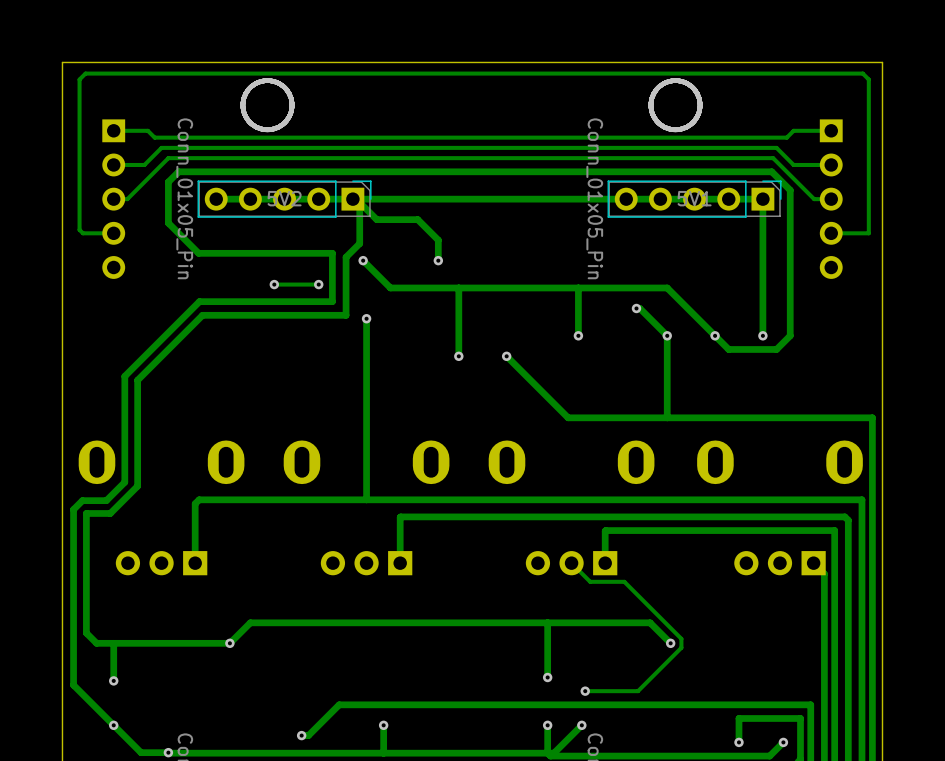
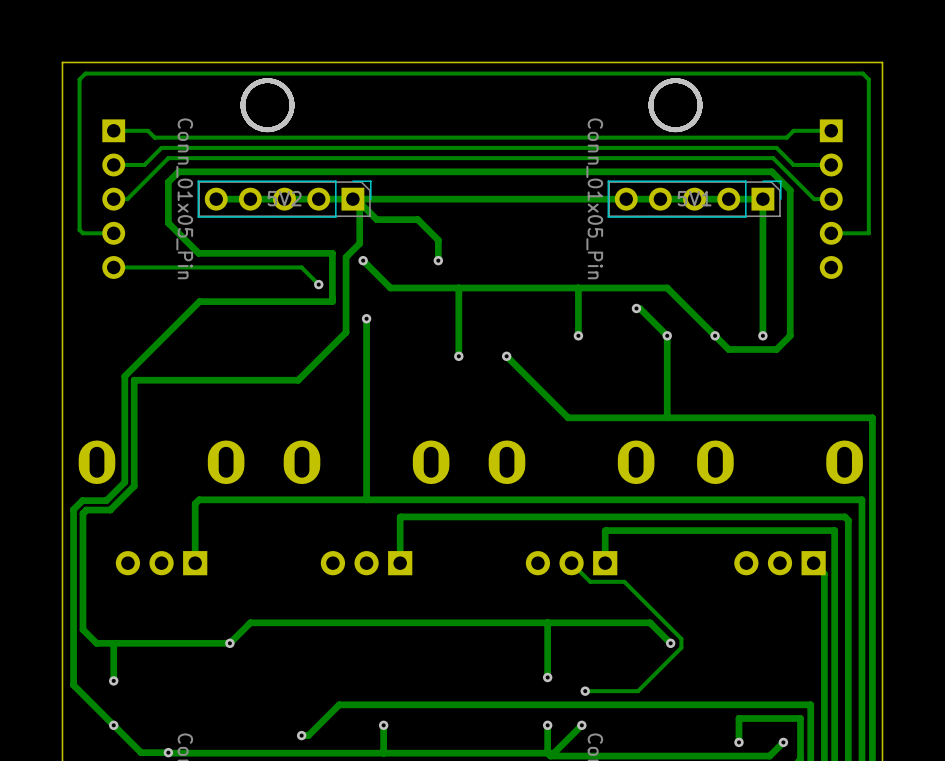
via: (274, 284) -> none
track: (318, 284) (274, 284) -> (318, 284) (301, 267) (113, 267)
track: (346, 315) (202, 315) (137, 380) (137, 486) (110, 513) (86, 513) (86, 633) -> (346, 315) (346, 332) (298, 380) (134, 380) (134, 486) (110, 510) (86, 510) (82, 513) (82, 629) (86, 633)

